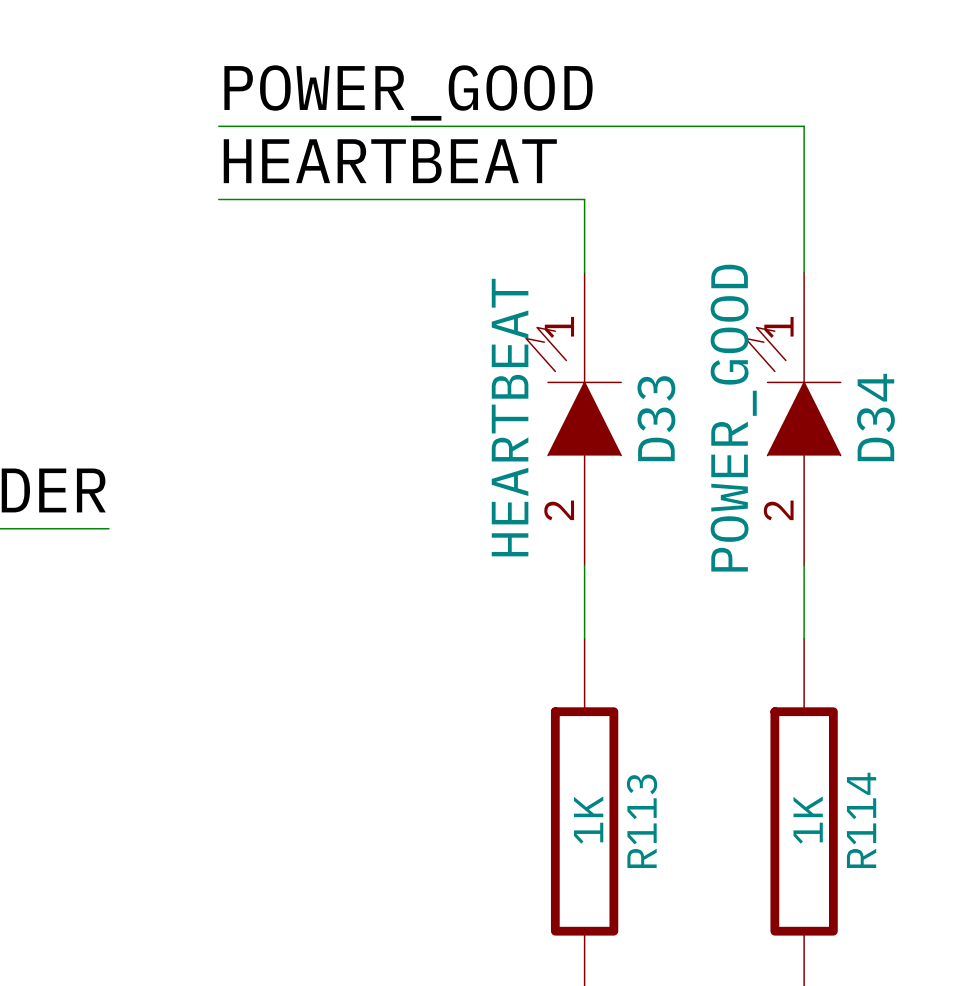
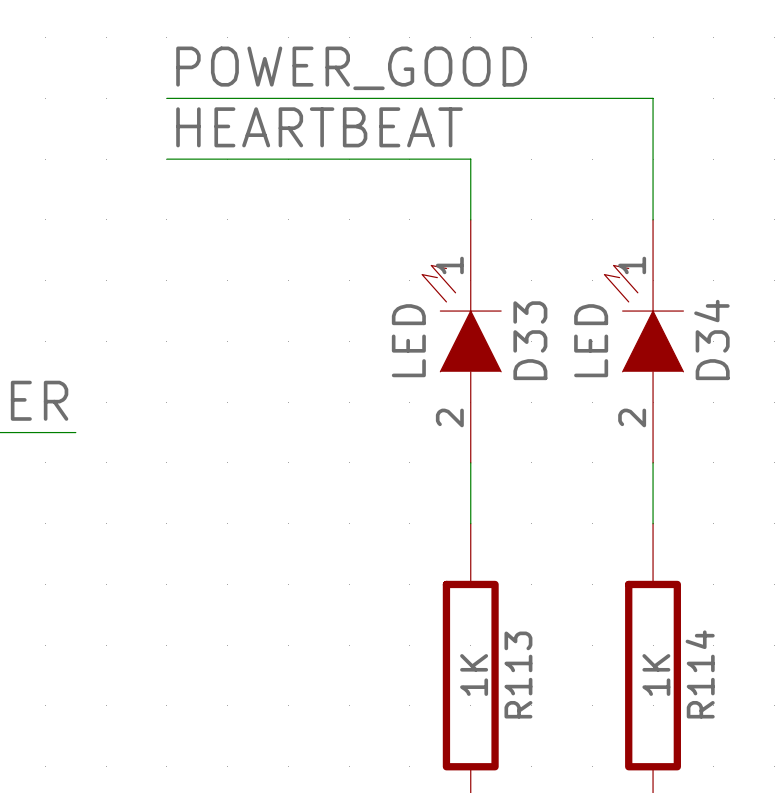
D33 value: HEARTBEAT (510, 417) -> LED (408, 340)
D34 value: POWER_GOOD (733, 418) -> LED (591, 340)

